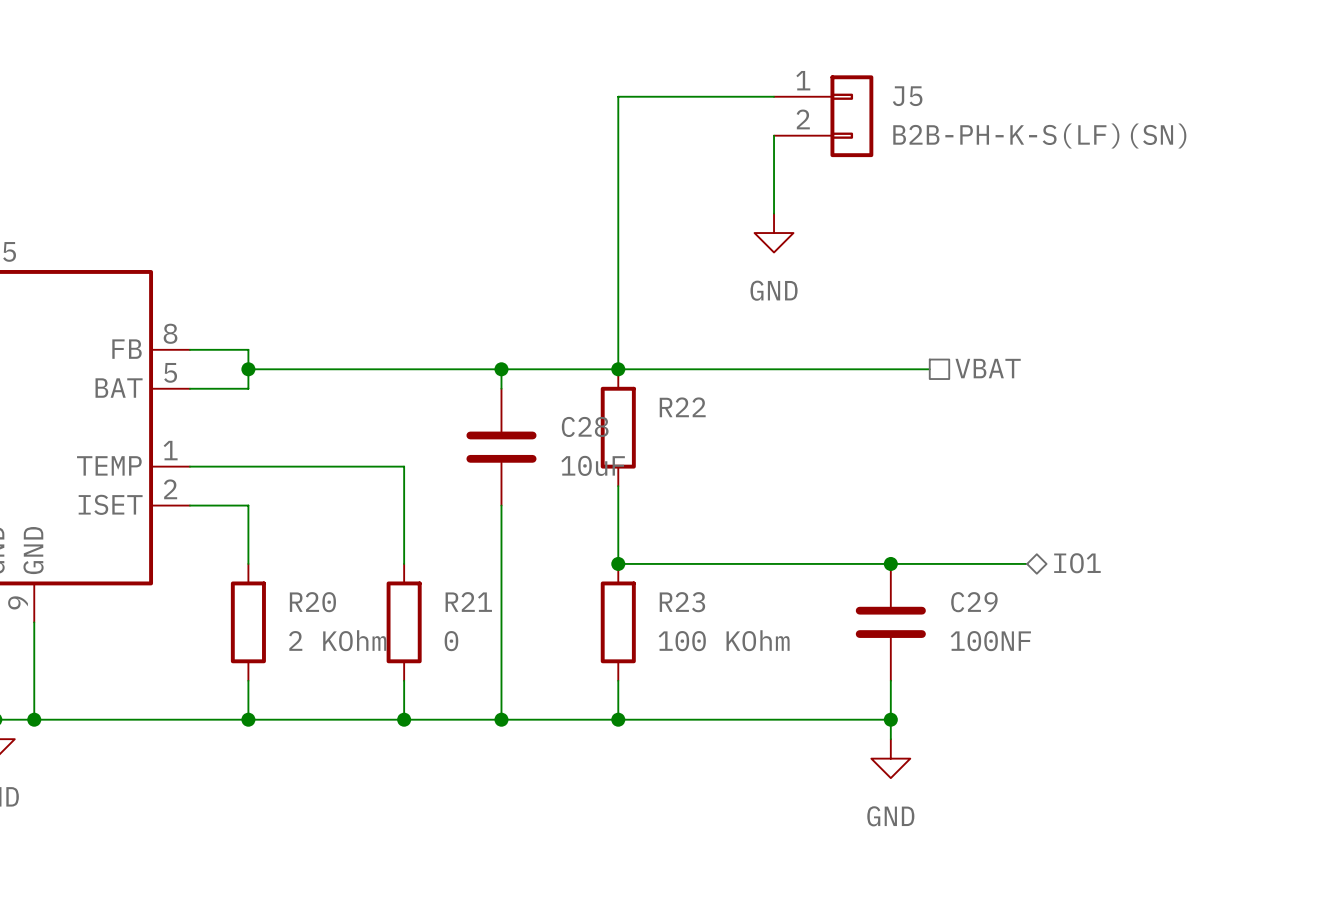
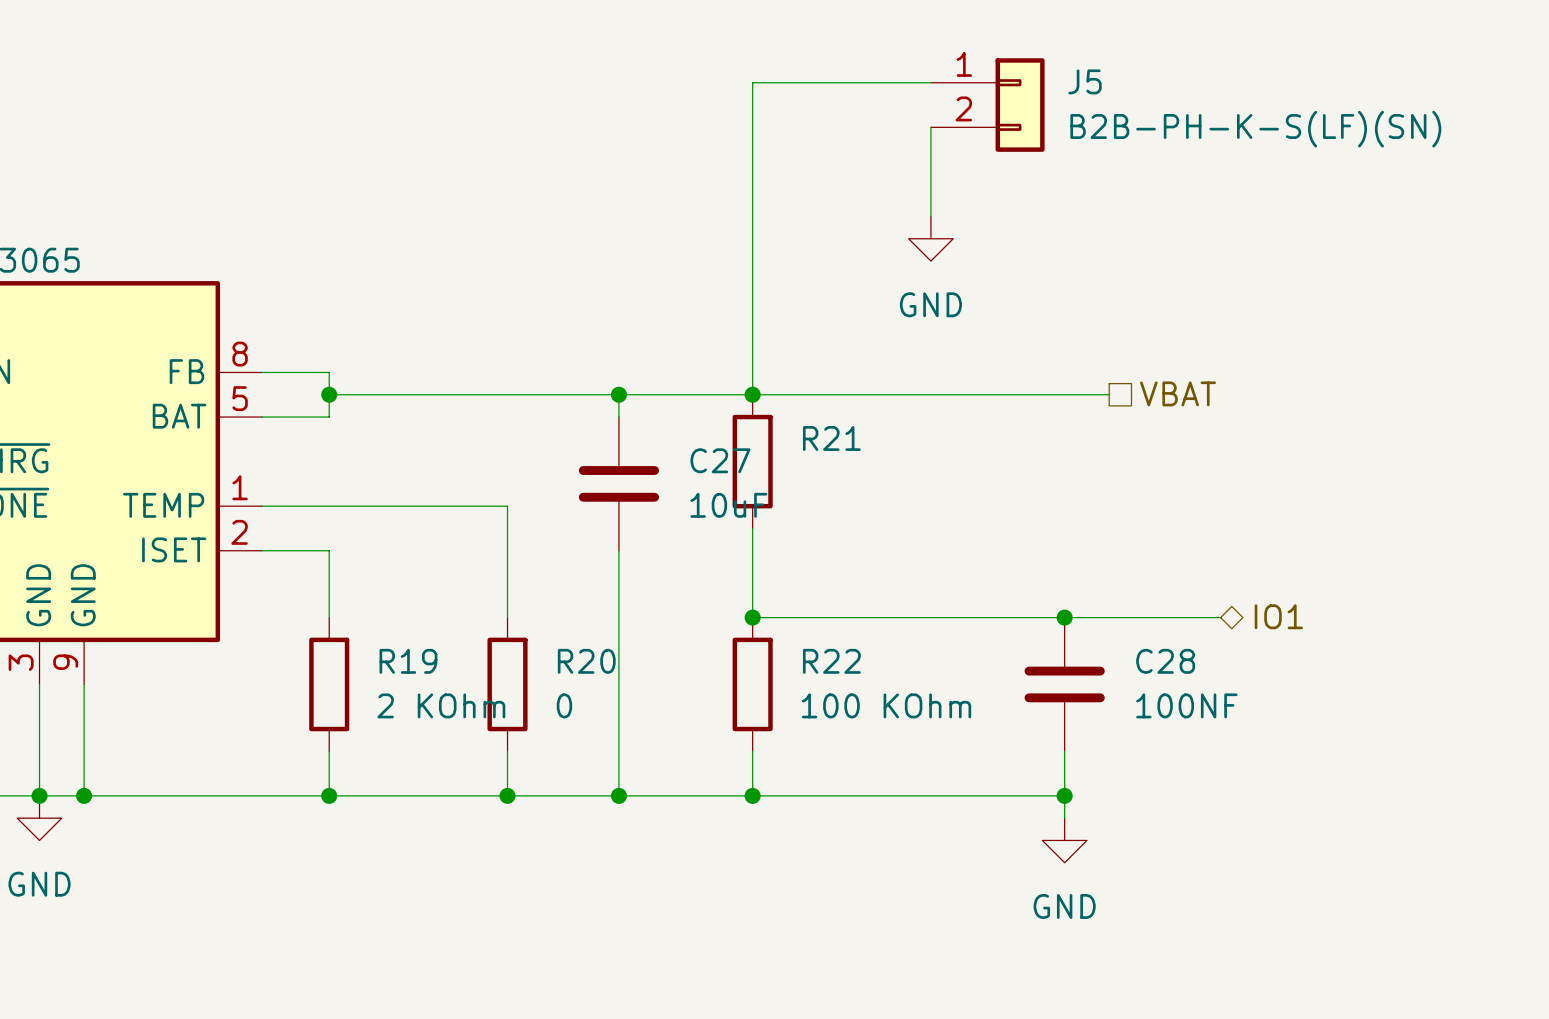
R22 name: R22 (682, 407) -> R21 (831, 438)
C28 name: C28 (585, 426) -> C27 (720, 460)
R20 name: R20 (312, 602) -> R19 (408, 661)
R21 name: R21 (468, 602) -> R20 (586, 661)
R23 name: R23 (682, 602) -> R22 (831, 661)
C29 name: C29 (974, 602) -> C28 (1165, 661)

